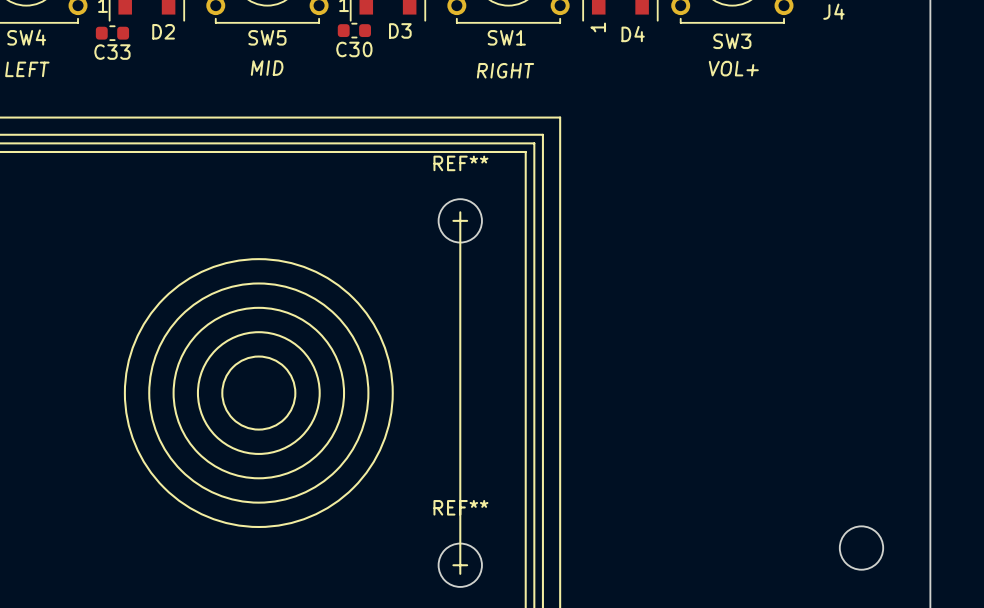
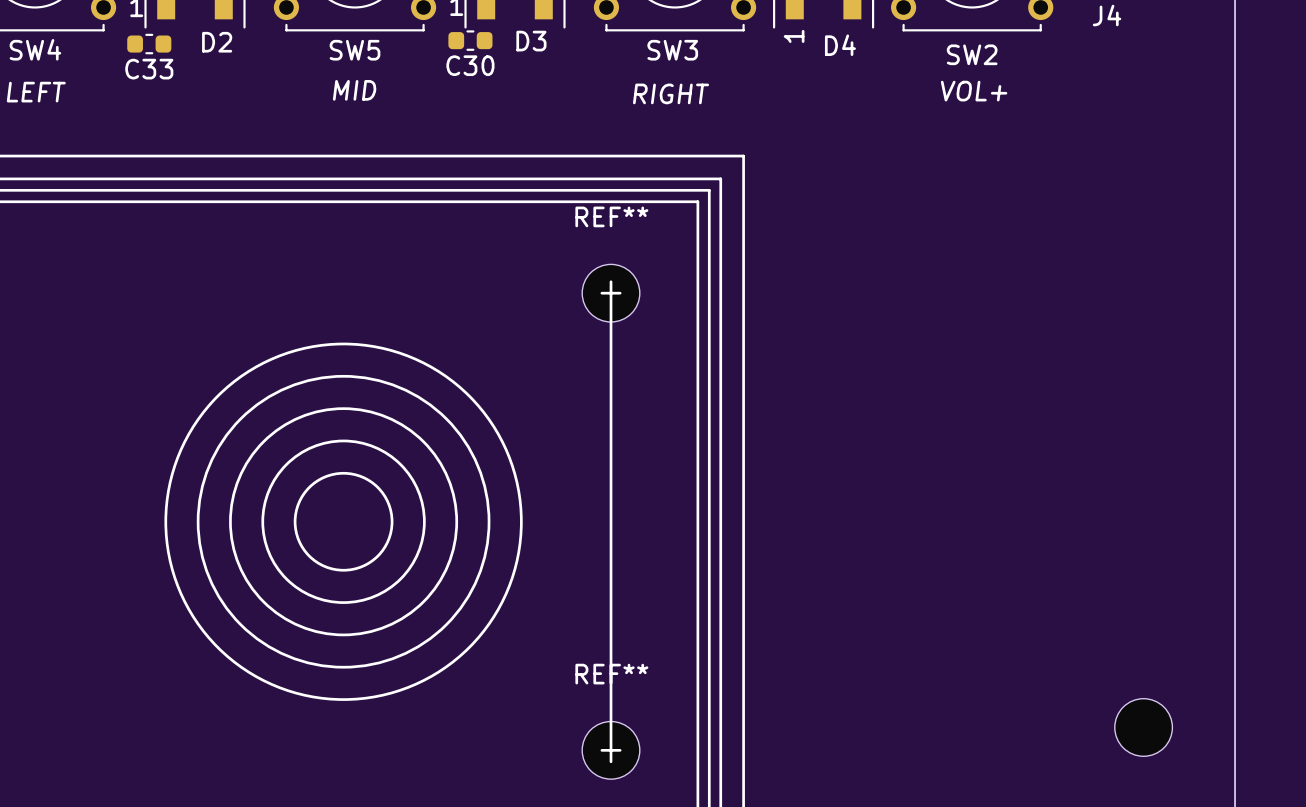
SW1 name: SW1 (506, 37) -> SW3 (672, 50)
SW3 name: SW3 (732, 41) -> SW2 (972, 54)

